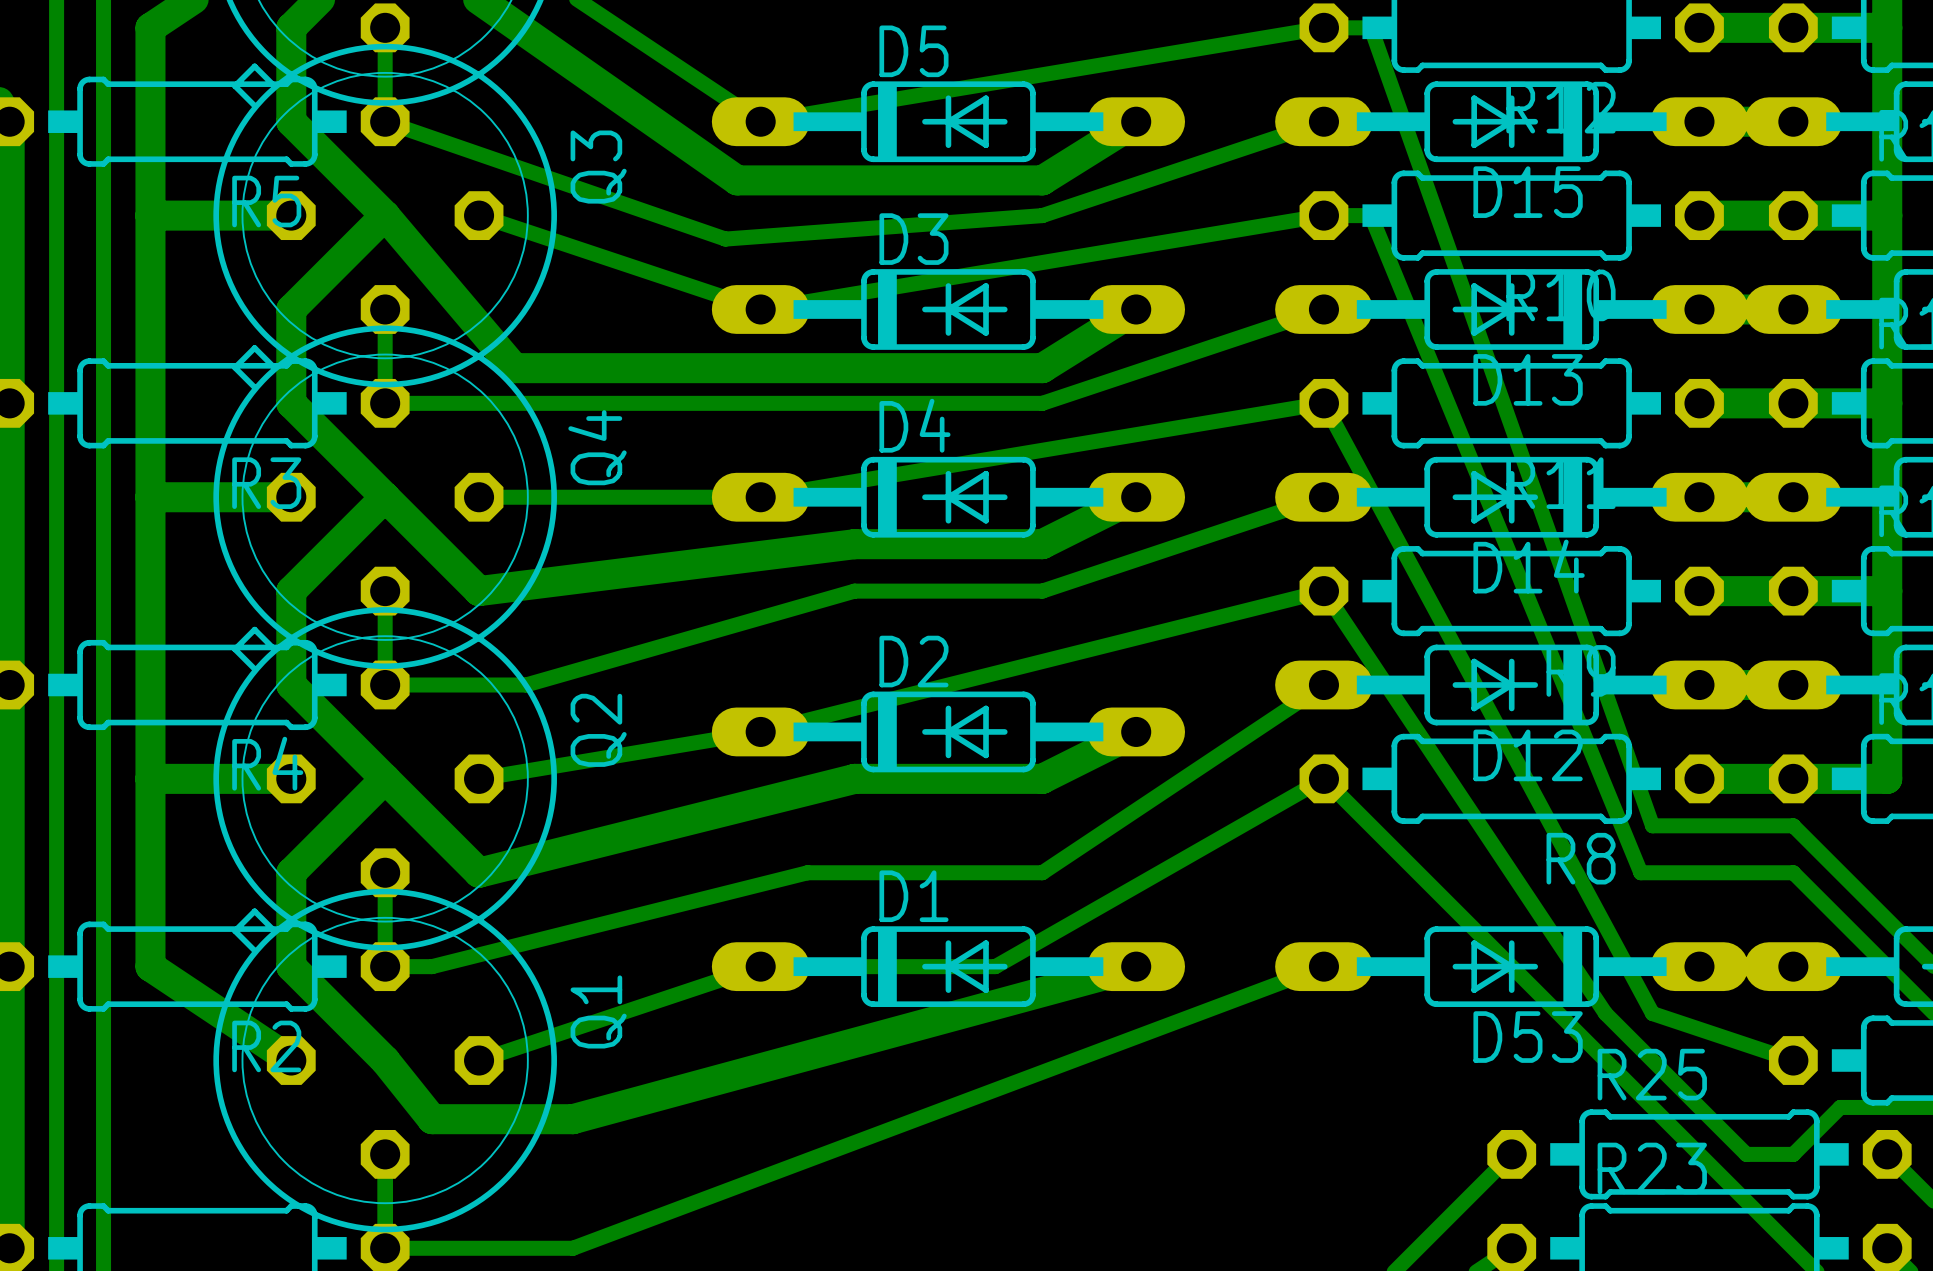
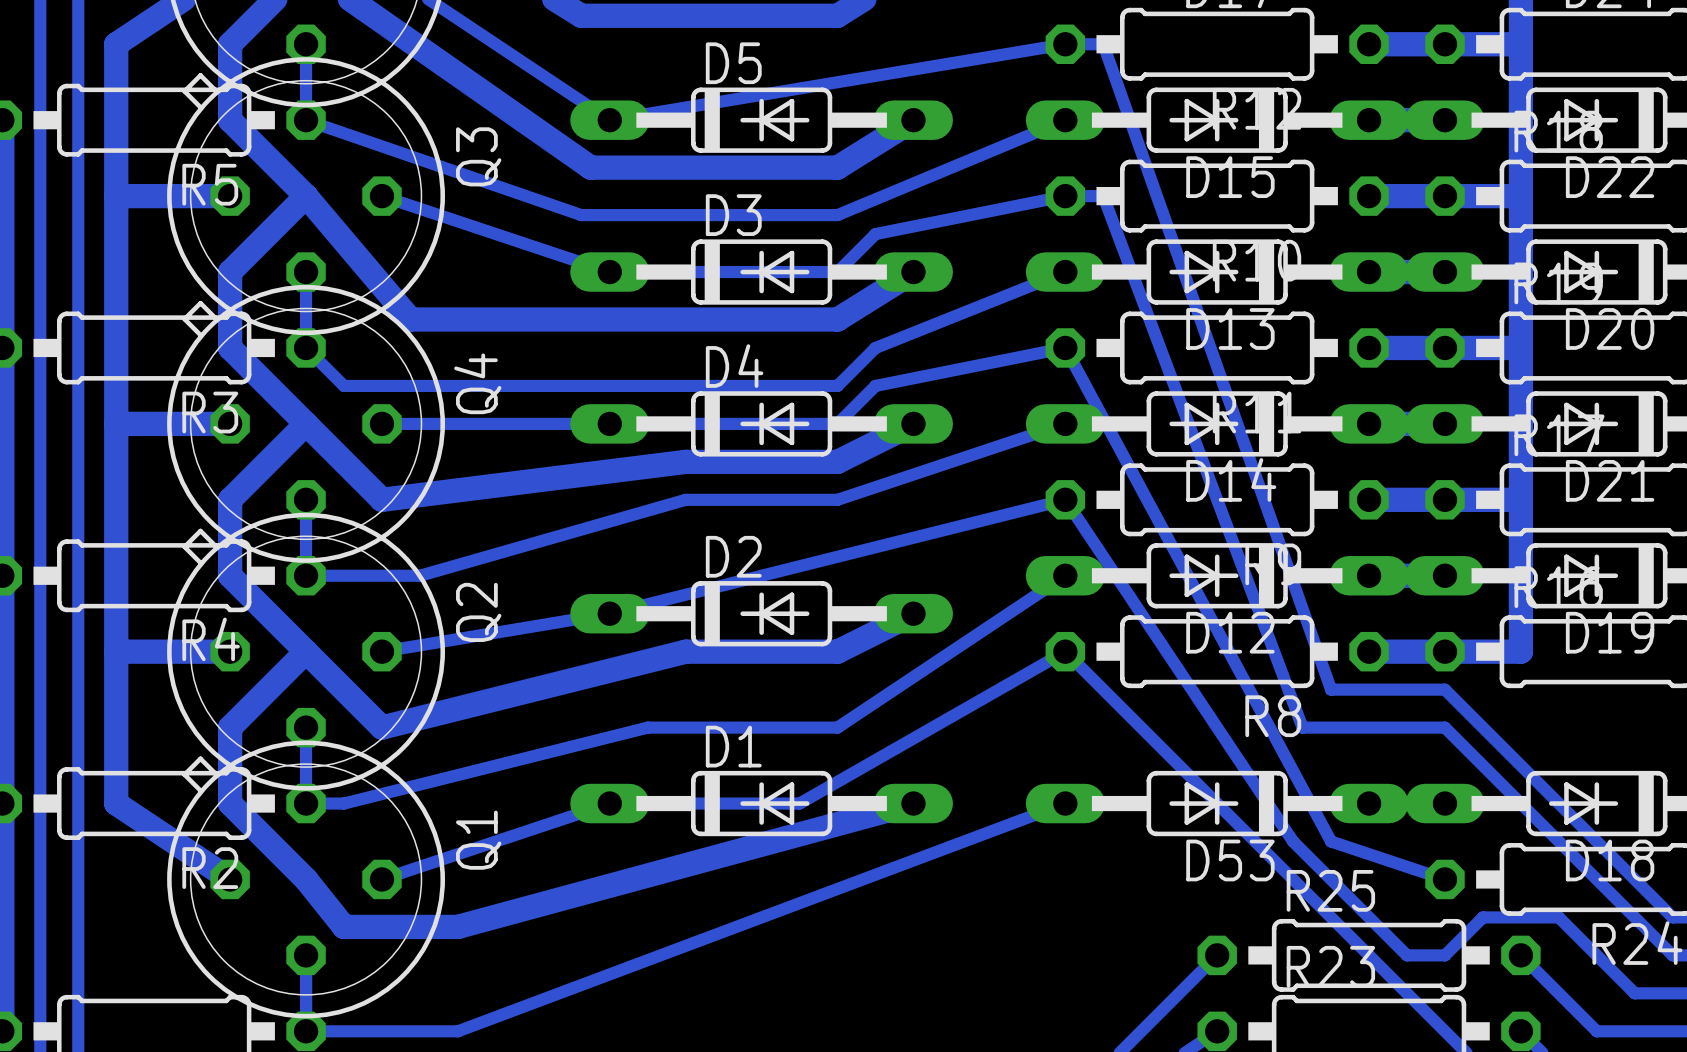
bottom track: (1323, 121) (1042, 215) (725, 239) -> (1065, 120) (837, 215) (581, 215)
bottom track: (1323, 215) (760, 309) -> (1065, 196) (875, 234) (837, 272) (609, 272)
bottom track: (1370, 215) (1640, 872) -> (1103, 196) (1302, 727) (1321, 727)
bottom track: (1323, 309) (1042, 403) (385, 403) -> (1065, 272) (875, 347) (837, 385) (344, 385) (306, 347)
bottom track: (1323, 403) (760, 497) -> (1065, 347) (875, 385) (837, 423) (609, 423)

